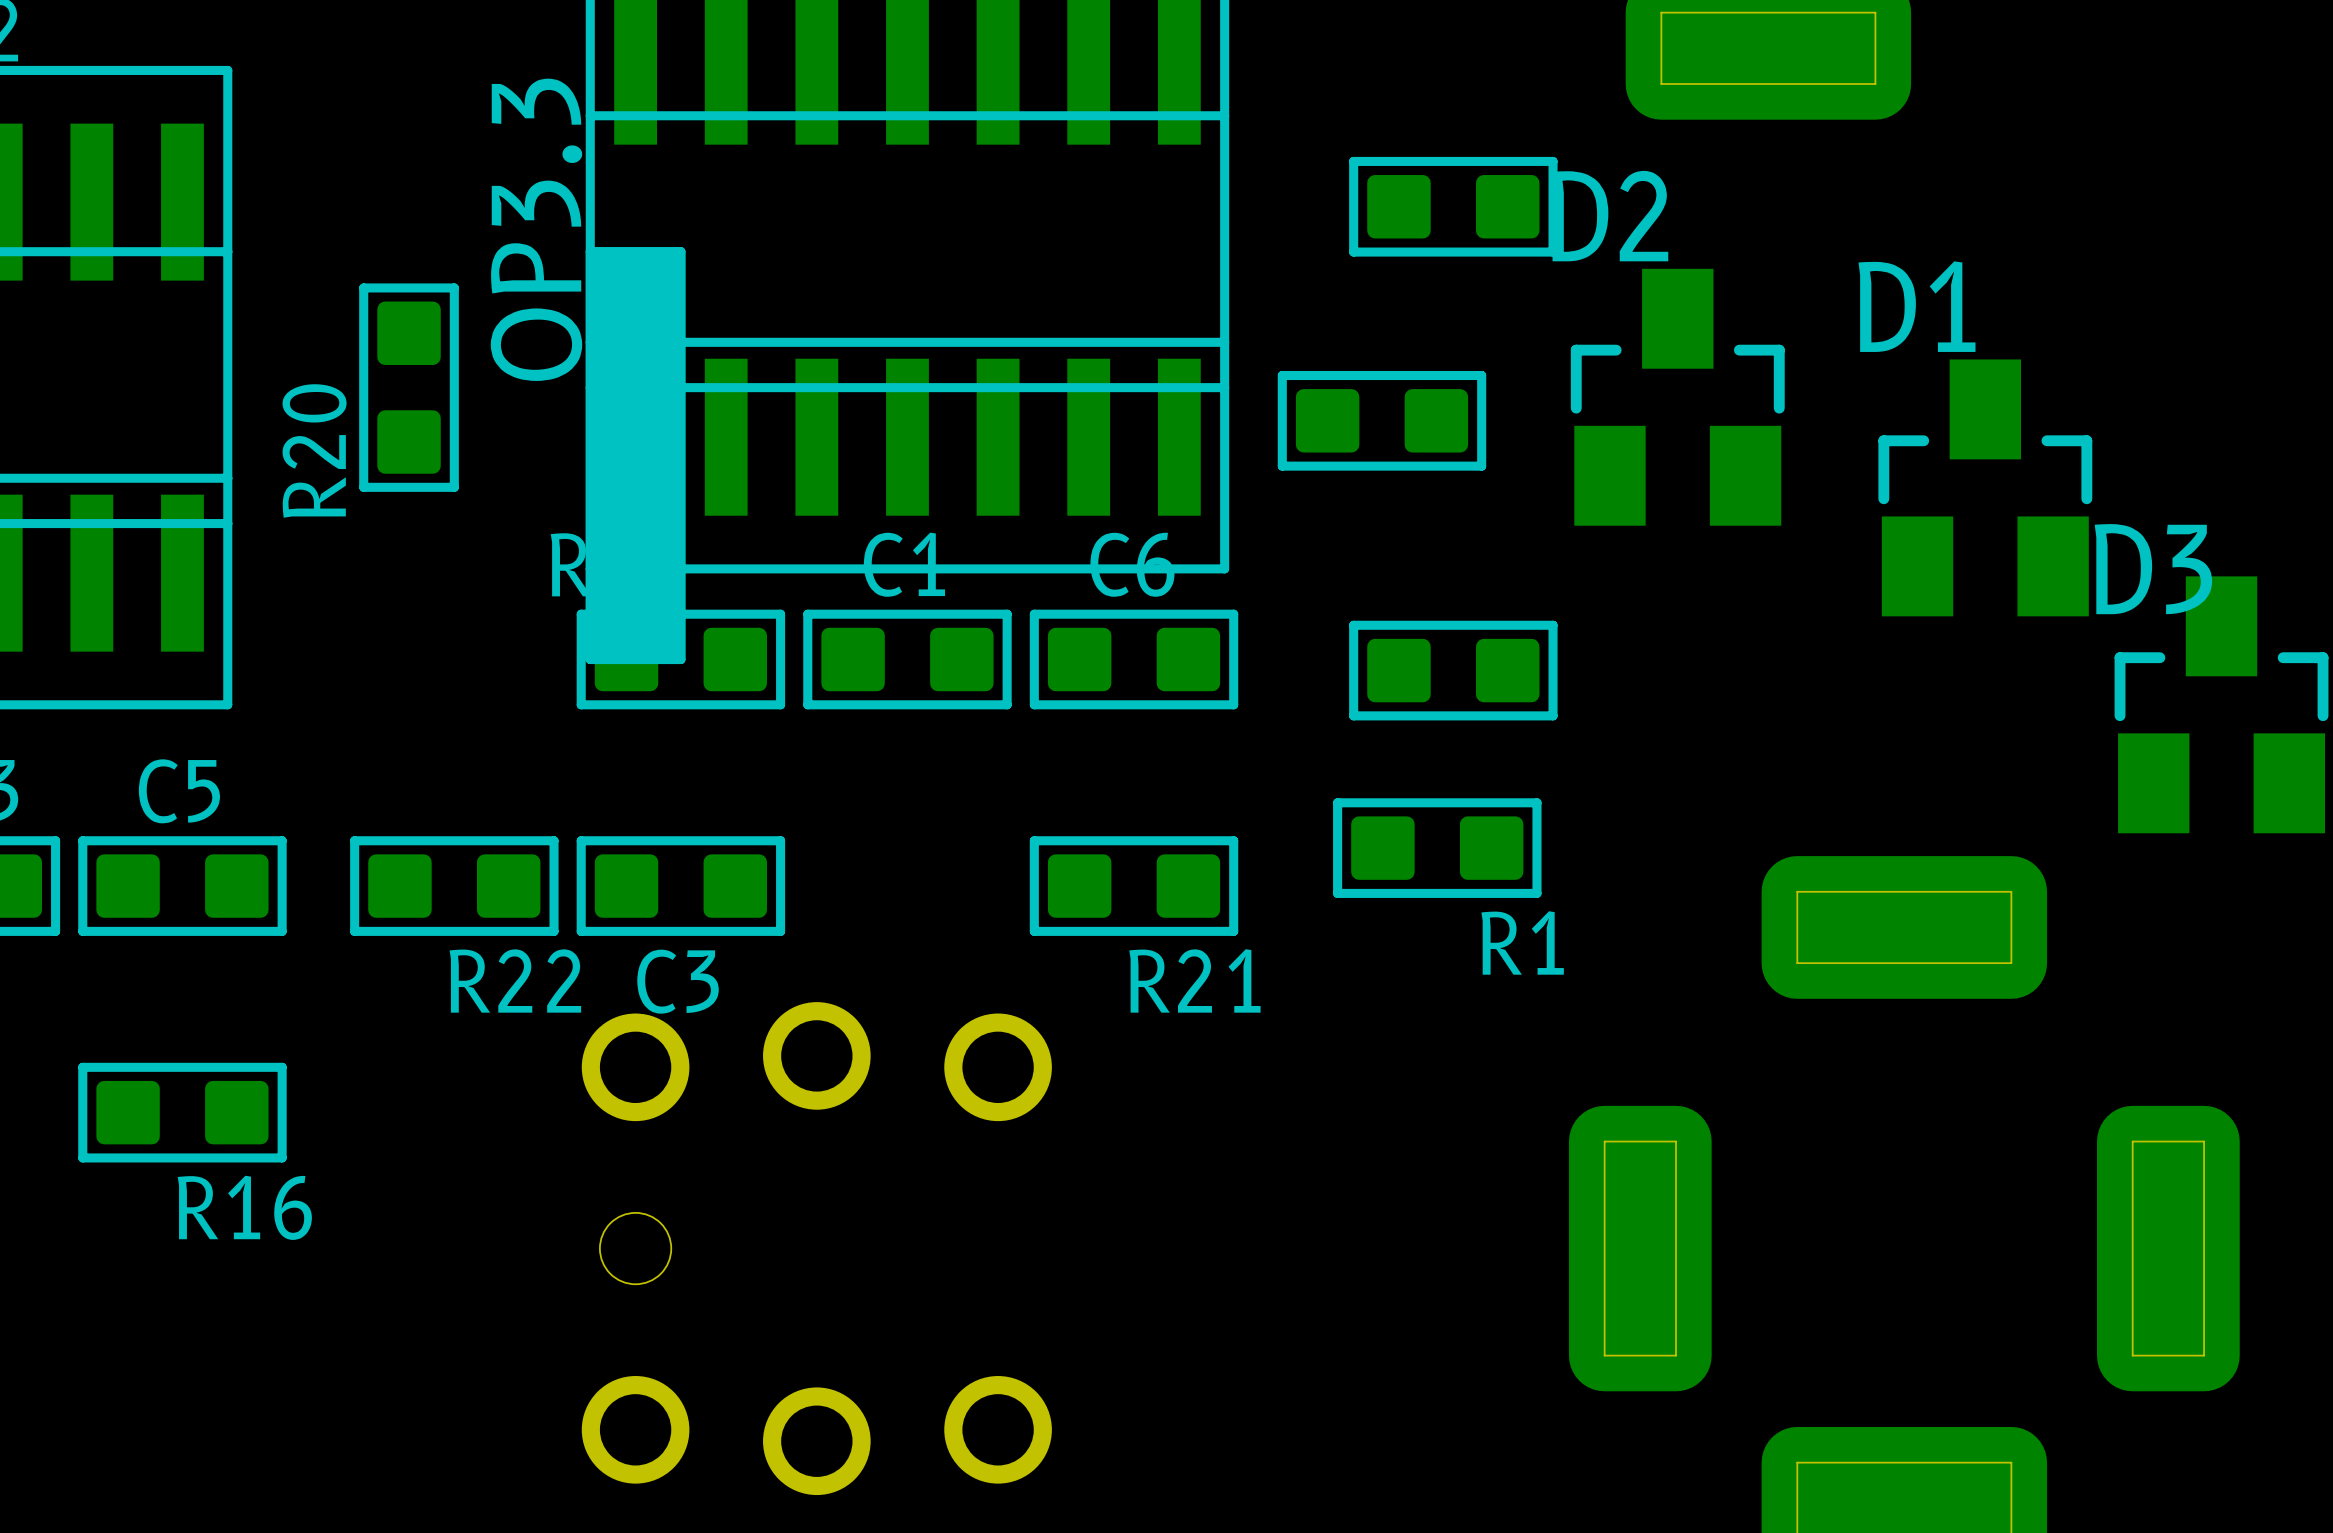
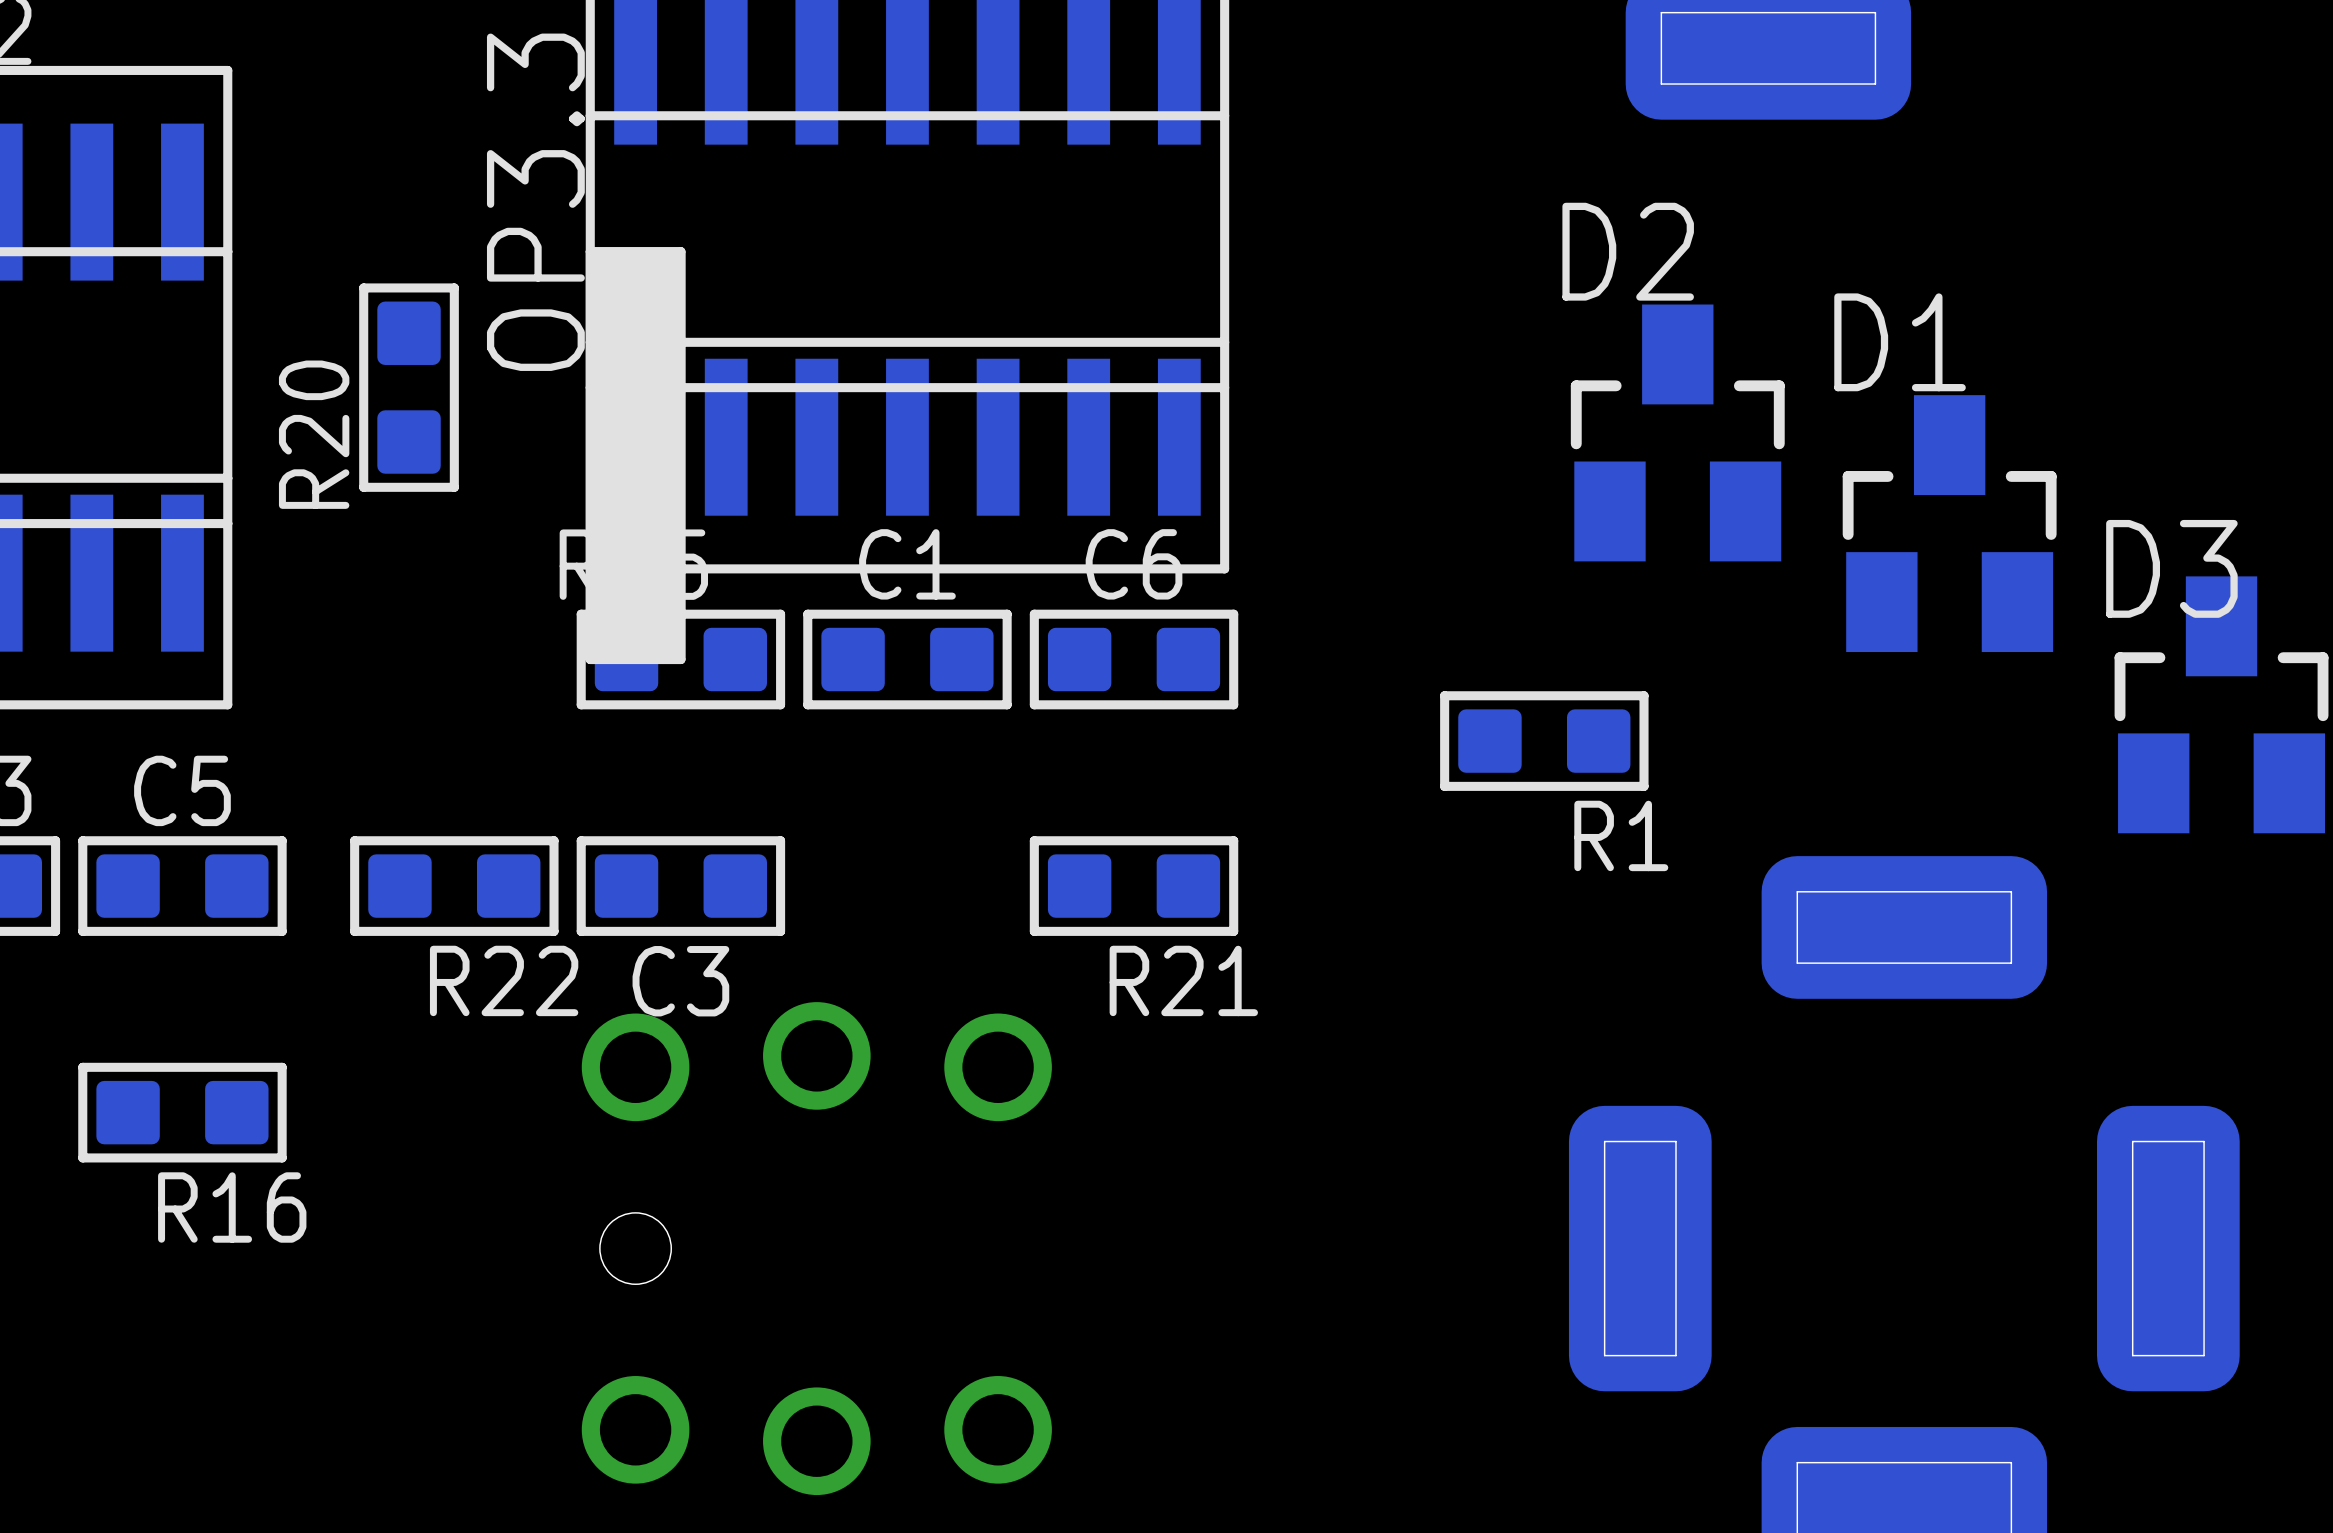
part: (1453, 206) -> none
D2 position: (1677, 397) -> (1677, 432)
part: (1381, 420) -> none
D1 position: (1985, 487) -> (1949, 523)
part: (1453, 670) -> none
R1 position: (1437, 848) -> (1544, 741)

